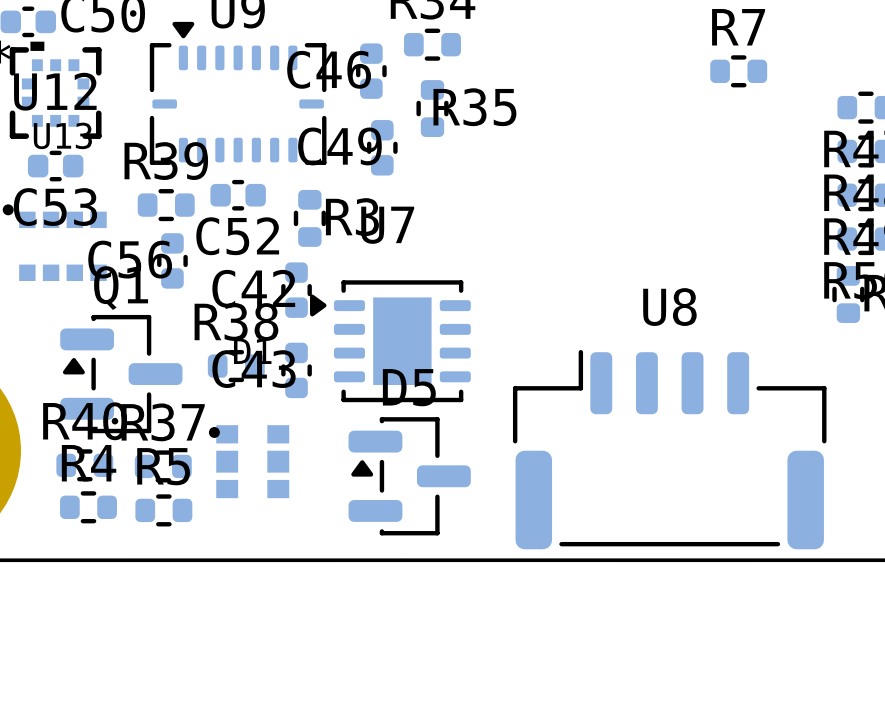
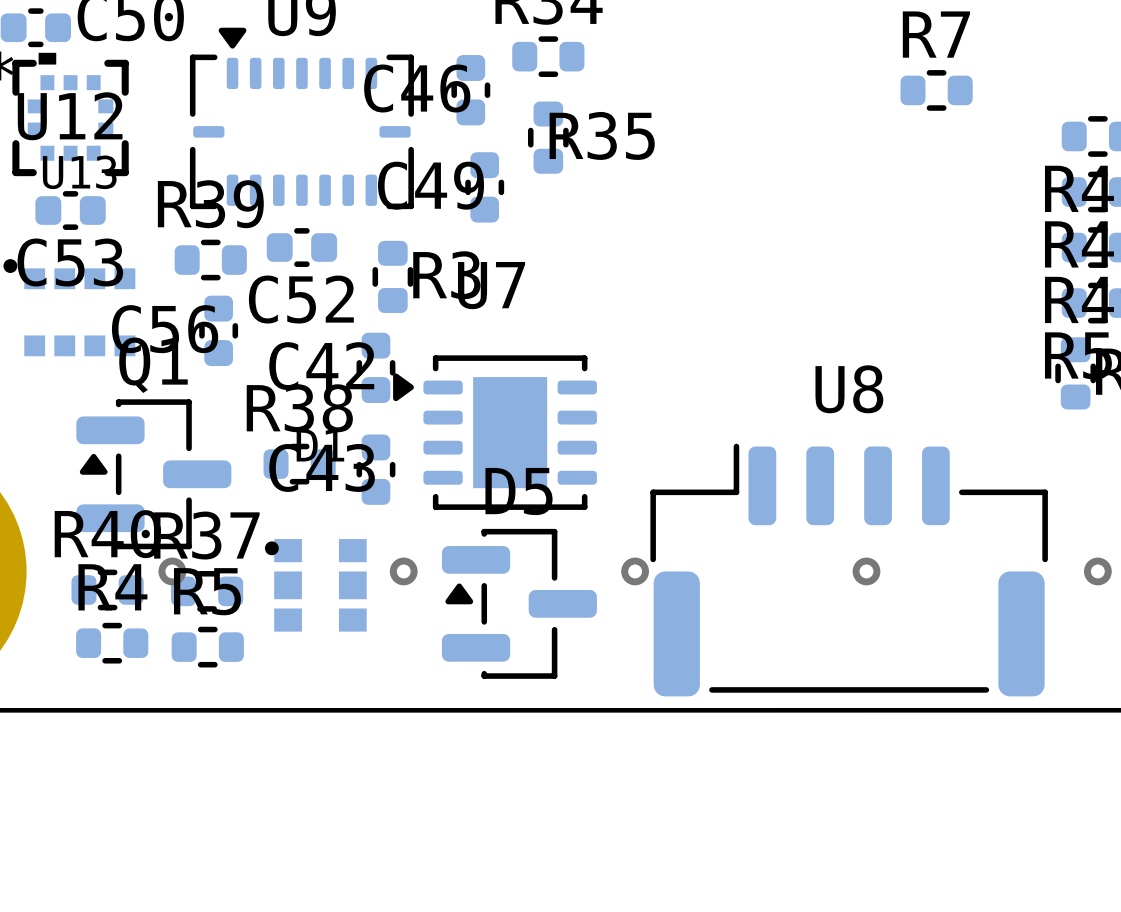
via: none -> (172, 571)
via: none -> (403, 571)
via: none -> (635, 571)
via: none -> (866, 571)
via: none -> (1097, 571)

